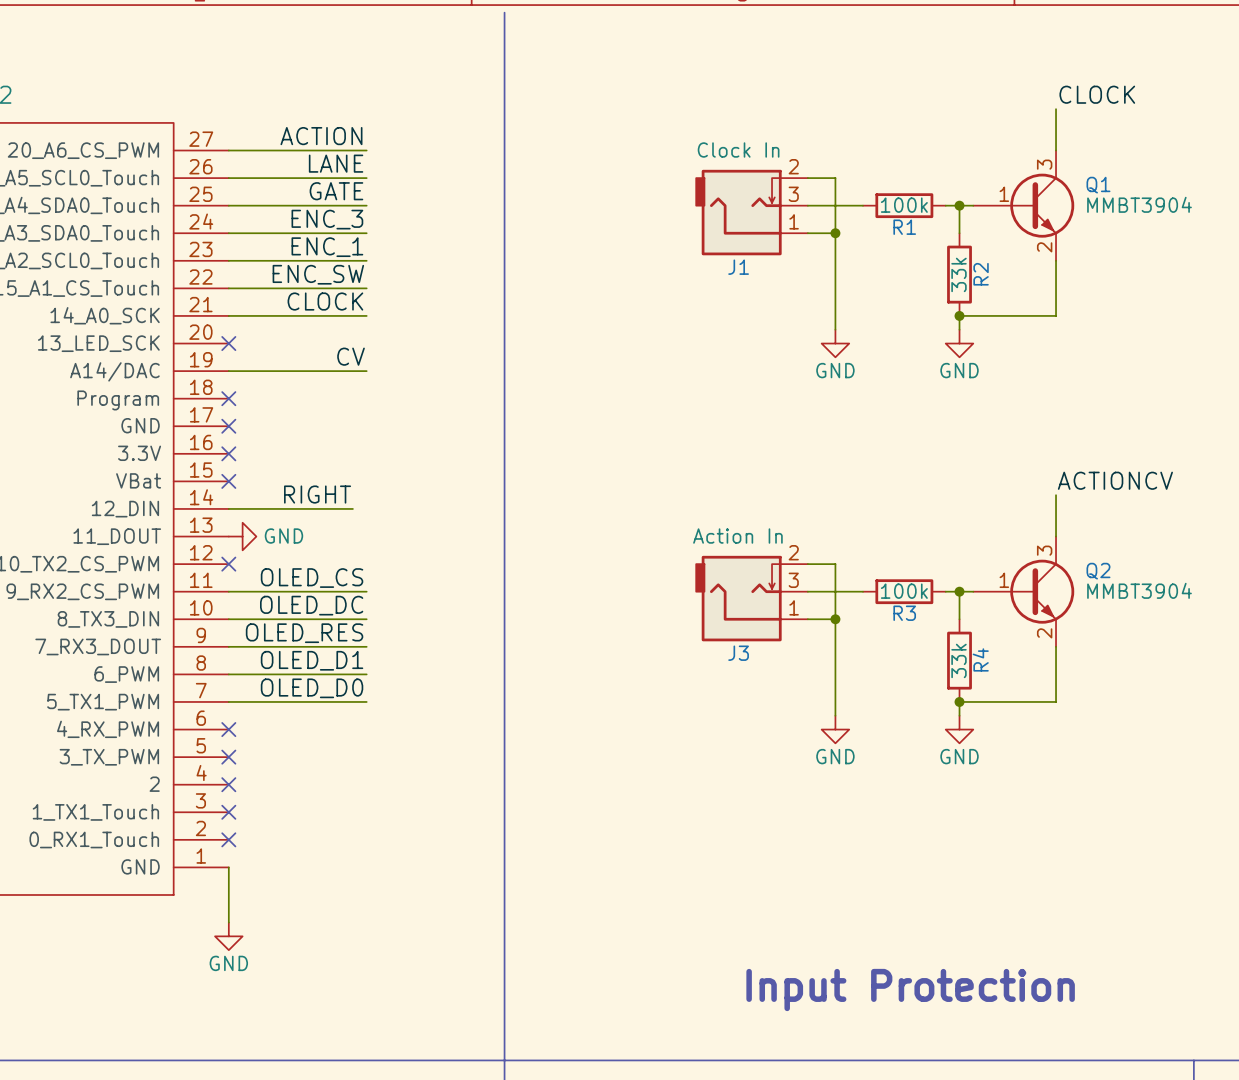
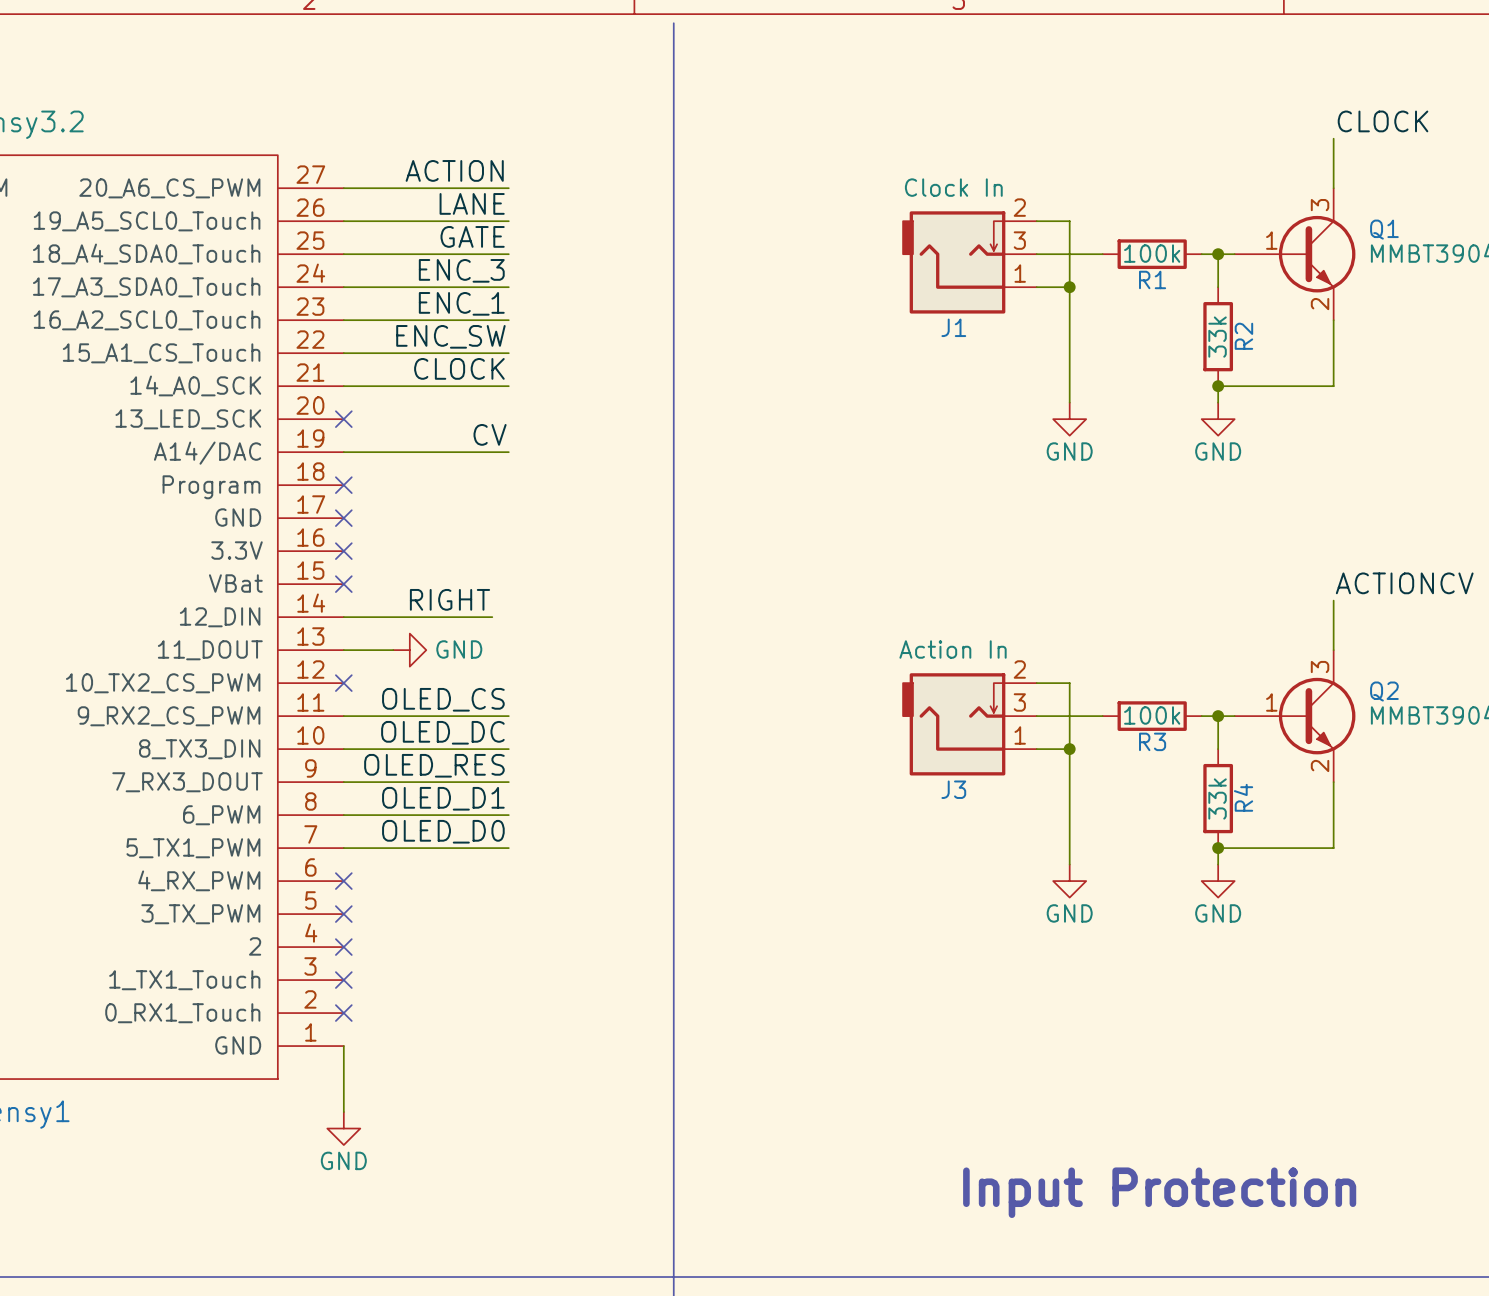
wire: none -> (343, 650) (393, 650)
power symbol position: GND (242, 536) -> GND (409, 650)

